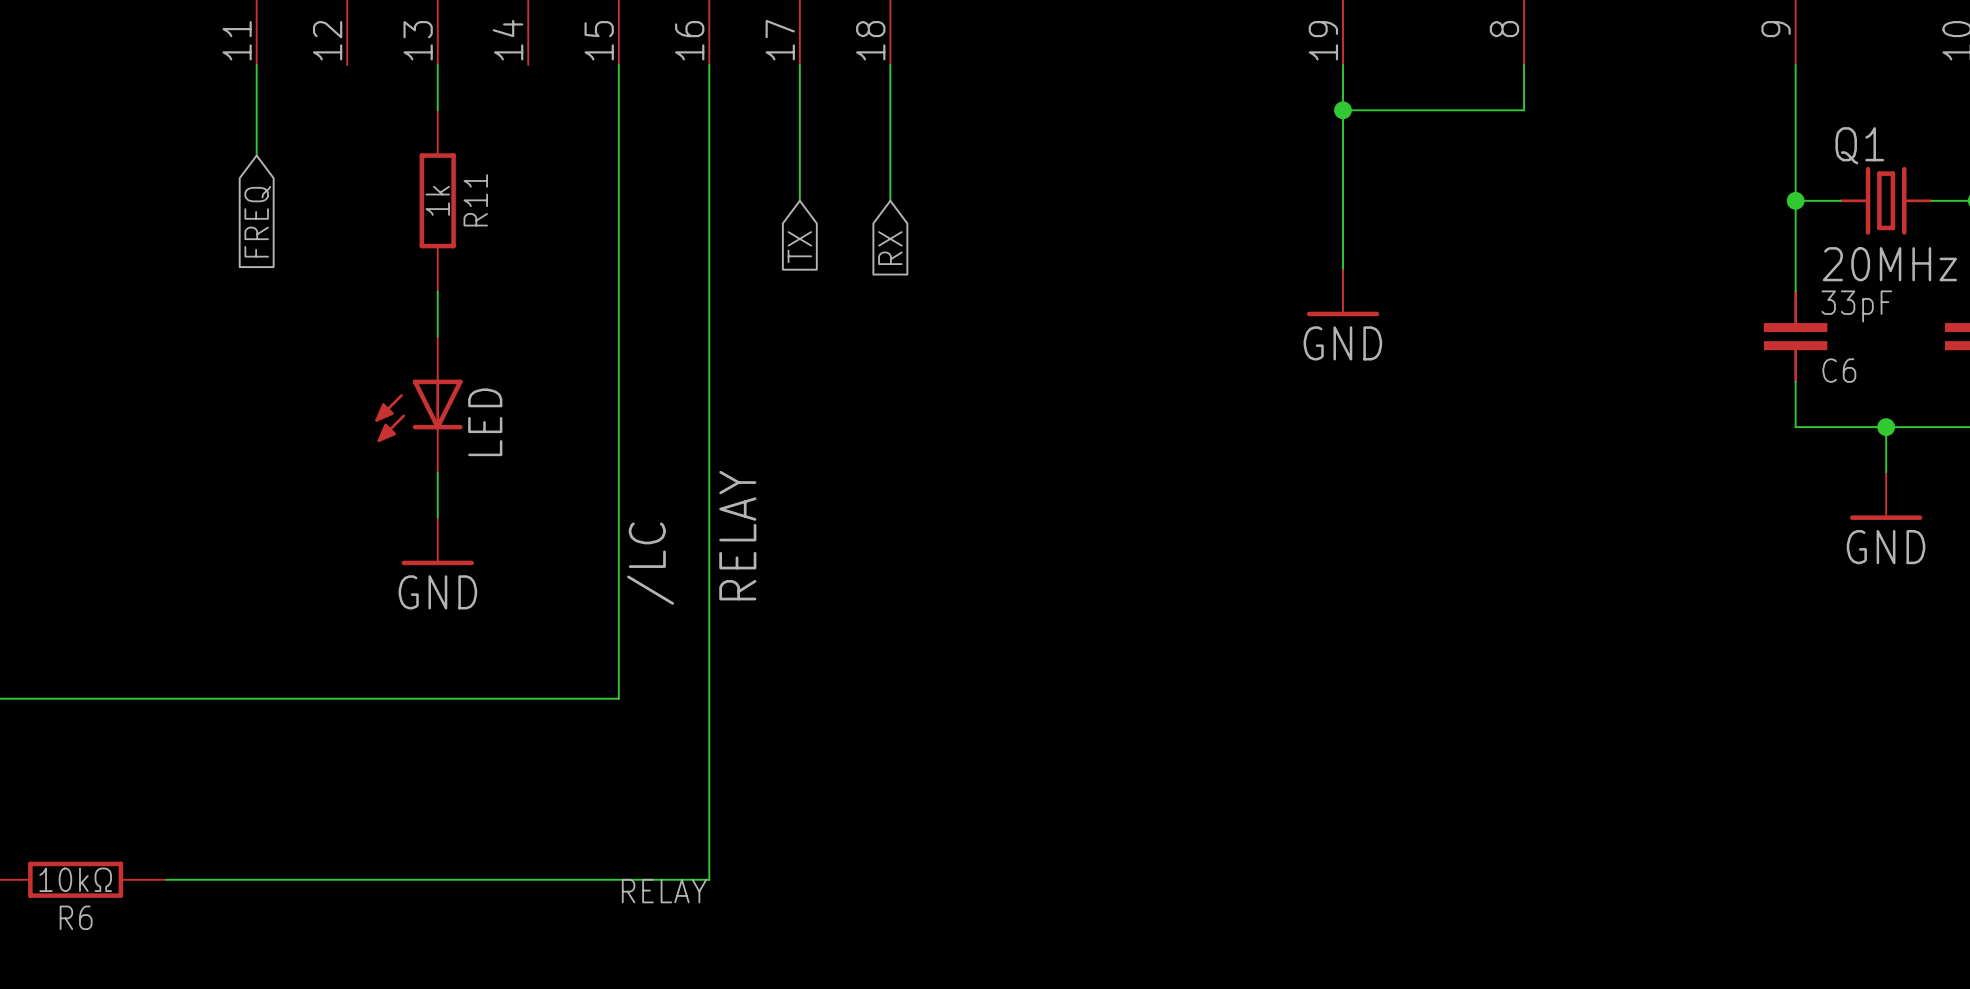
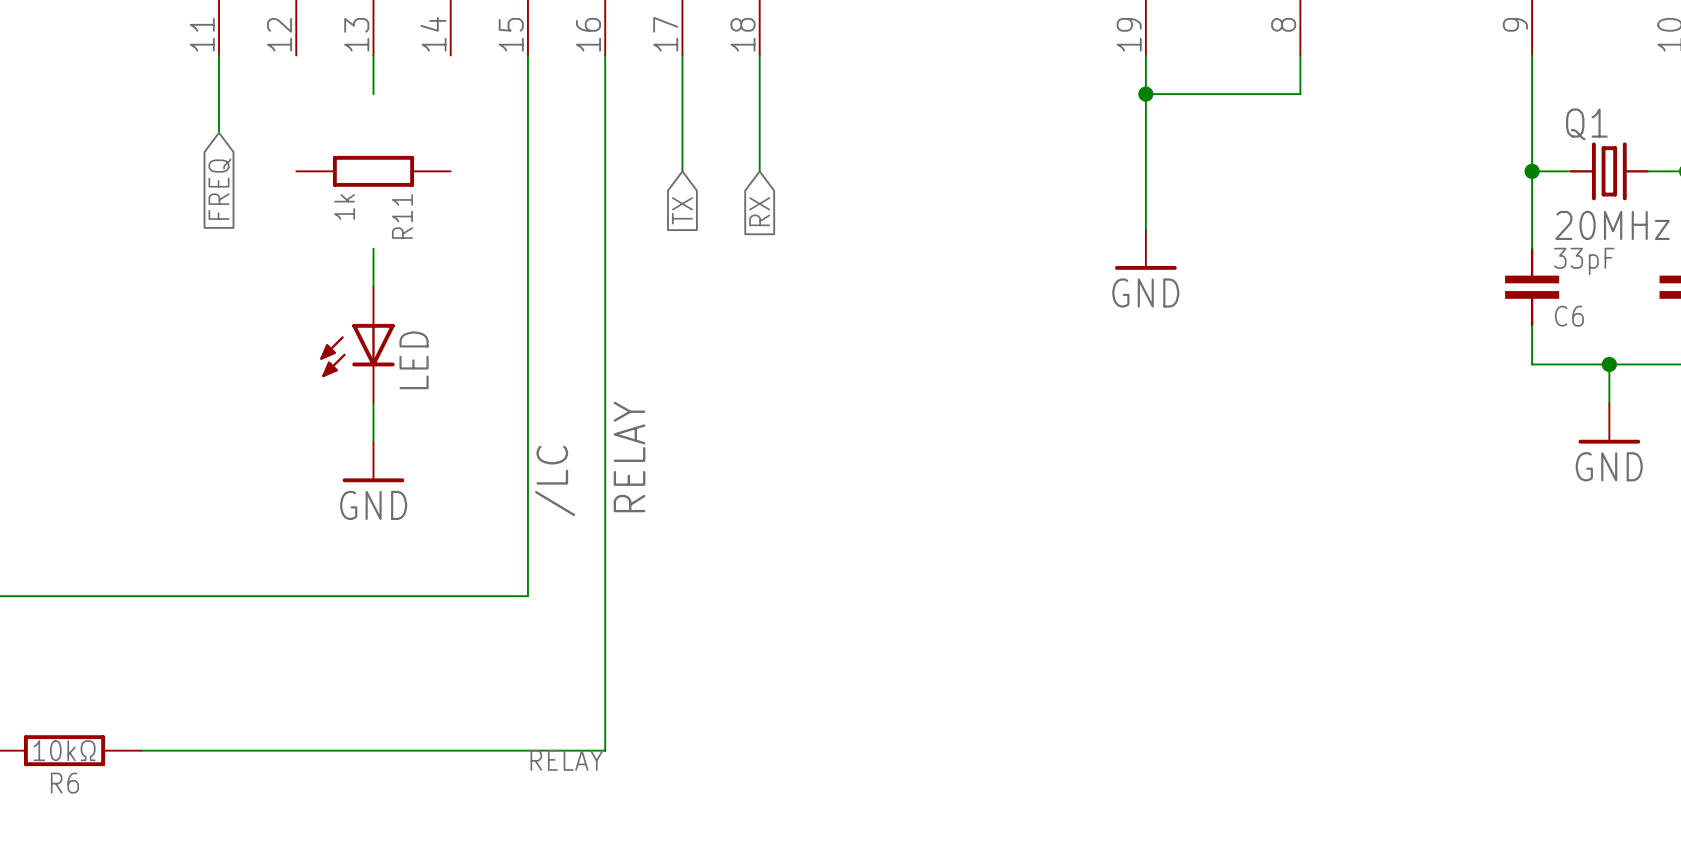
R11 rotation: 0° (437, 200) -> 90° clockwise (373, 171)
R11 value position: 1k (437, 200) -> 1k (344, 206)
R11 name position: R11 (475, 200) -> R11 (402, 216)

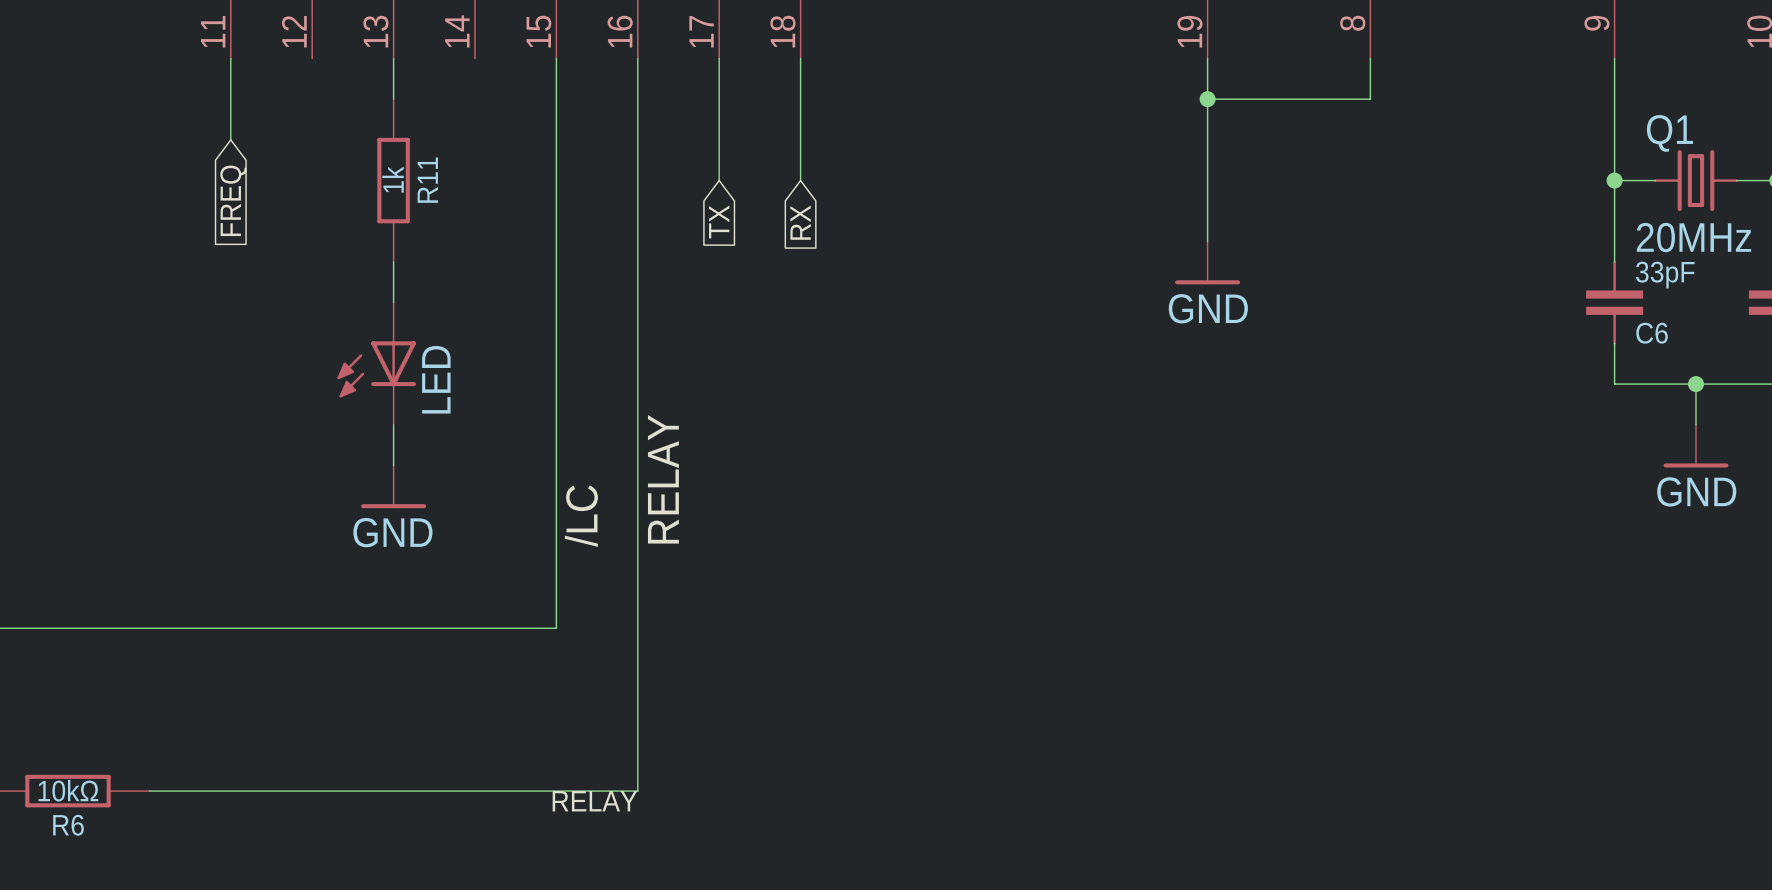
R11 rotation: 0° (373, 171) -> 90° clockwise (393, 180)
R11 value position: 1k (344, 206) -> 1k (393, 179)
R11 name position: R11 (402, 216) -> R11 (427, 180)

